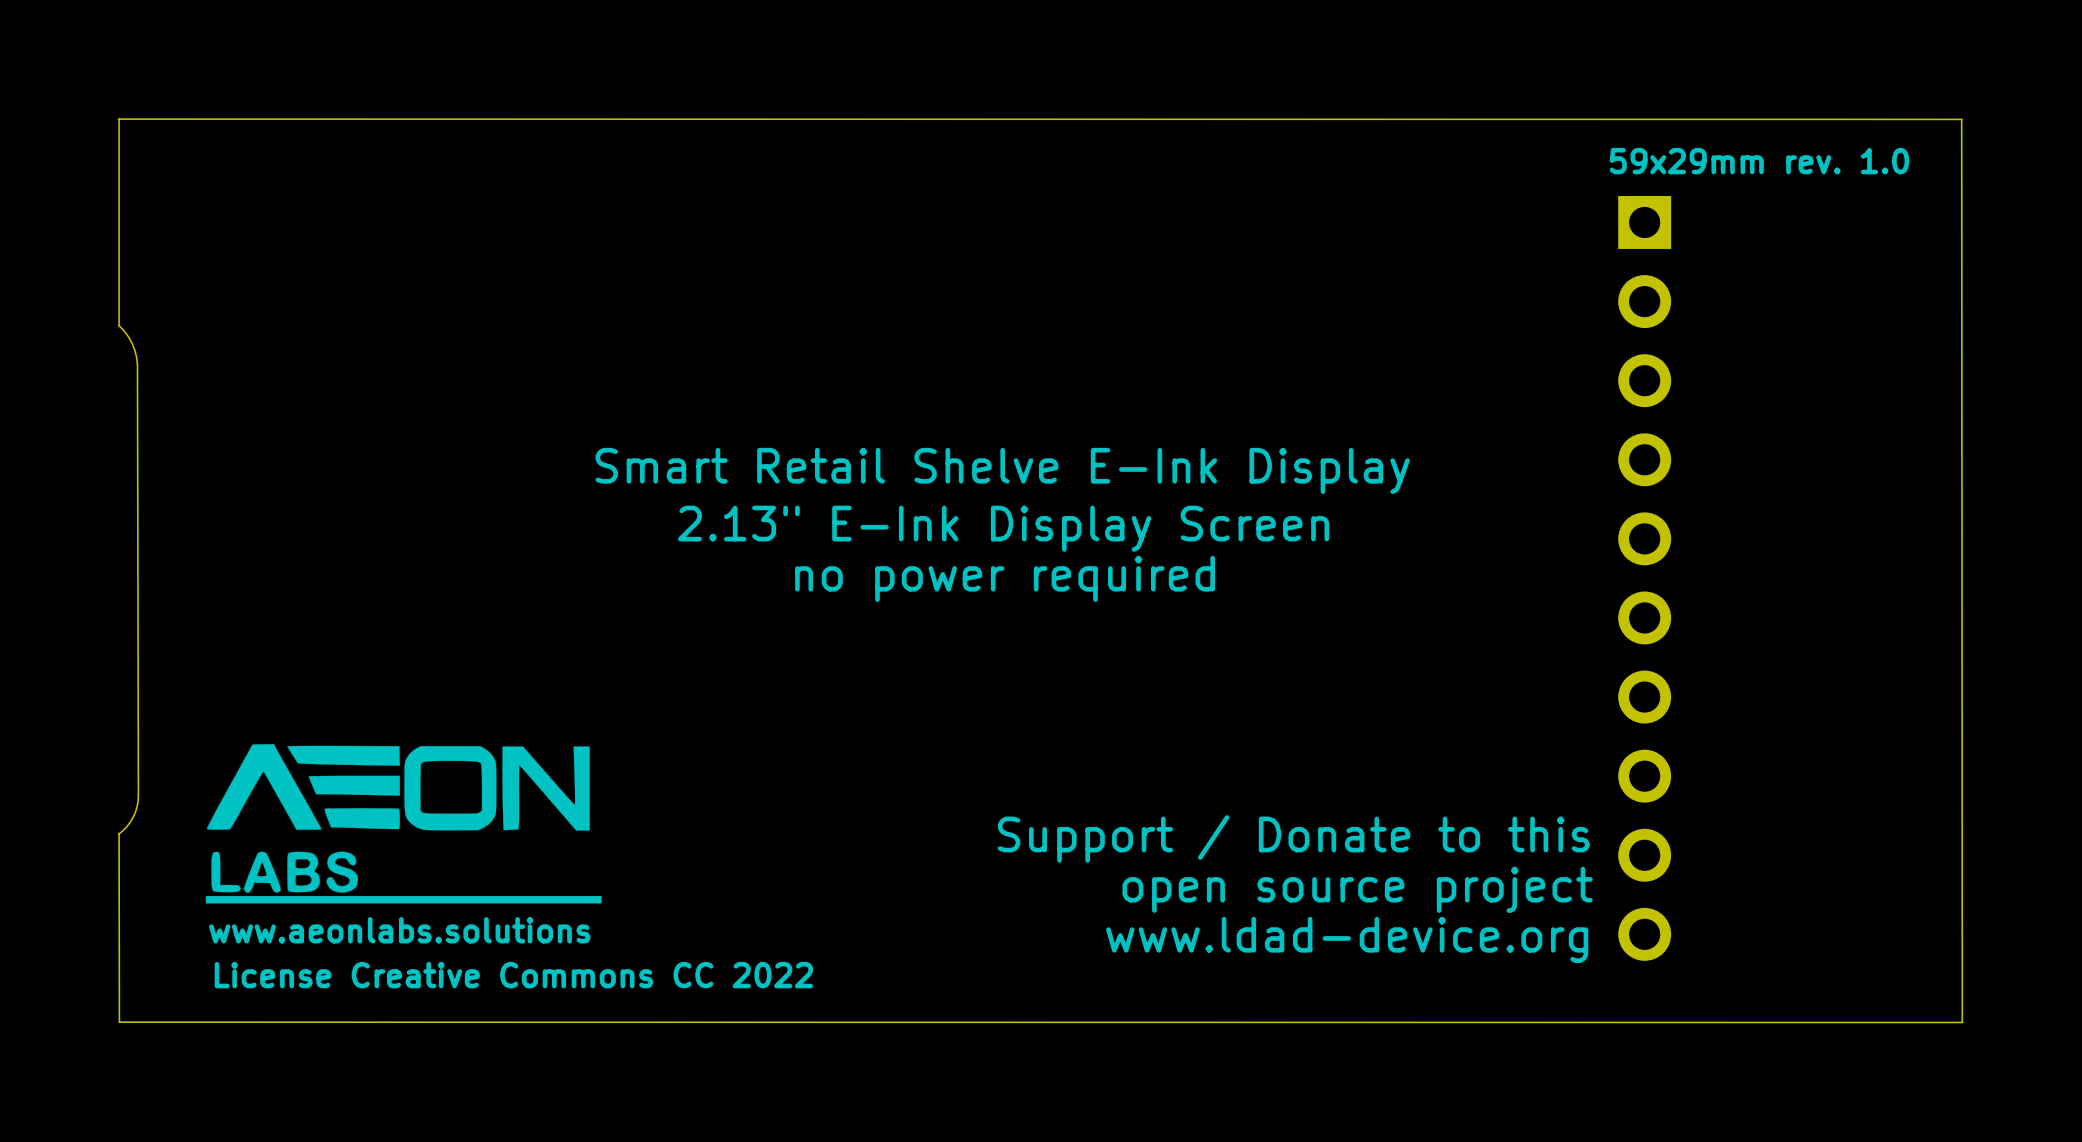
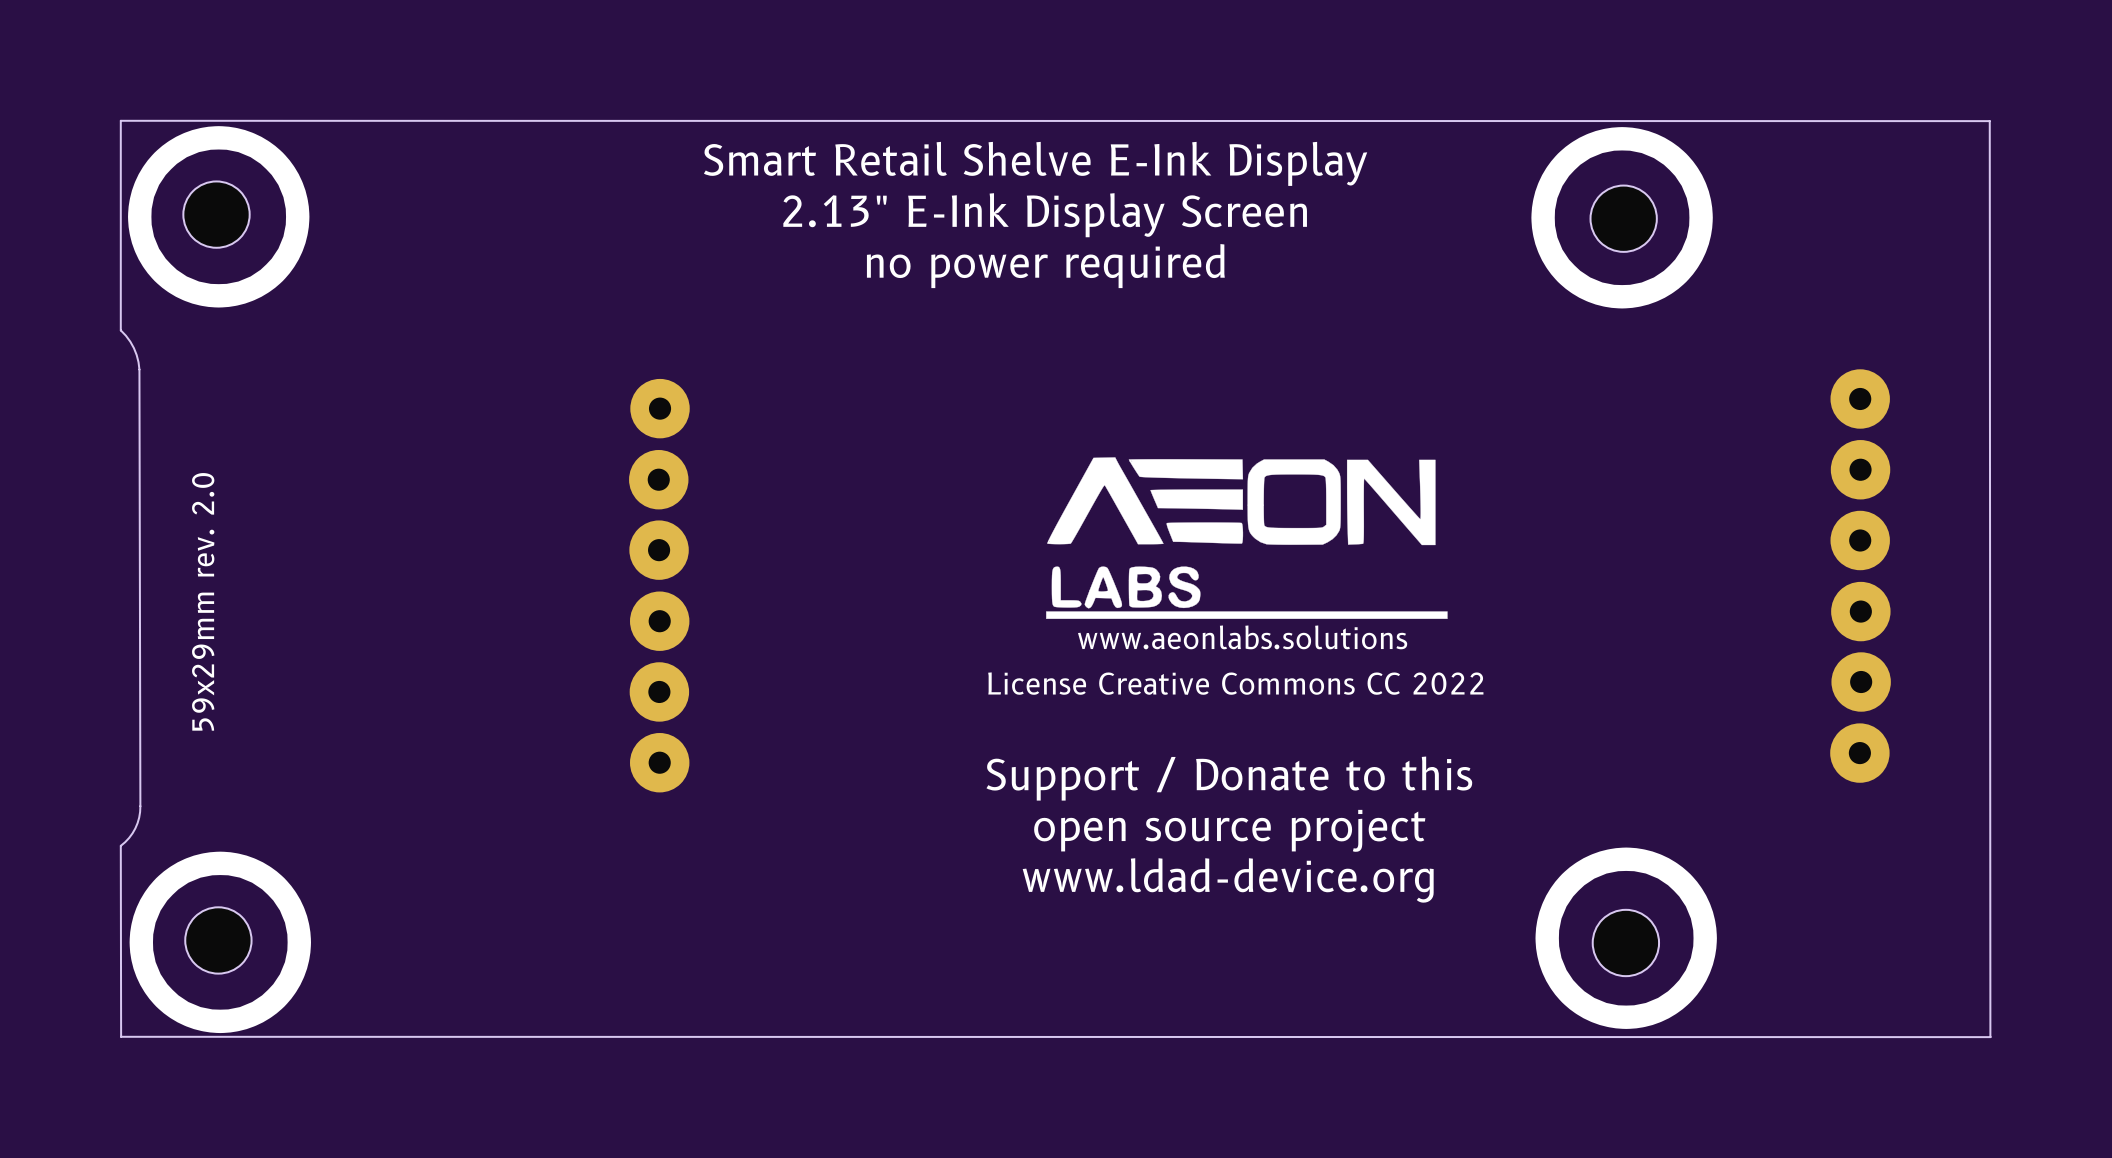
drawing: none -> [128, 126, 310, 308]
drawing: none -> [1531, 127, 1713, 309]
text: 59x29mm rev. 1.0 (1759, 161) -> none
part: none -> (216, 214)
part: none -> (1623, 218)
drawing: none -> [1046, 457, 1448, 619]
text position: Smart Retail Shelve E-Ink Display (1002, 470) -> Smart Retail Shelve E-Ink Display (1035, 163)
text position: 2.13" E-Ink Display Screen (1003, 528) -> 2.13" E-Ink Display Screen (1045, 215)
part: none -> (1860, 576)
text: none -> 59x29mm rev. 2.0 (203, 601)
part: none -> (659, 585)
text position: no power required (1005, 578) -> no power required (1045, 266)
part: (1644, 578) -> none
text: none -> www.aeonlabs.solutions (1242, 637)
drawing: [205, 744, 602, 904] -> none
drawing: none -> [1535, 847, 1717, 1029]
text position: Support / Donate to this (1293, 838) -> Support / Donate to this (1229, 778)
drawing: none -> [129, 851, 311, 1034]
text position: open source project (1357, 889) -> open source project (1229, 830)
part: none -> (218, 940)
part: none -> (1625, 942)
text: www.aeonlabs.solutions (399, 930) -> none
text position: www.ldad-device.org (1347, 939) -> www.ldad-device.org (1228, 880)
text position: License Creative Commons CC 2022 (513, 975) -> License Creative Commons CC 2022 (1235, 683)

